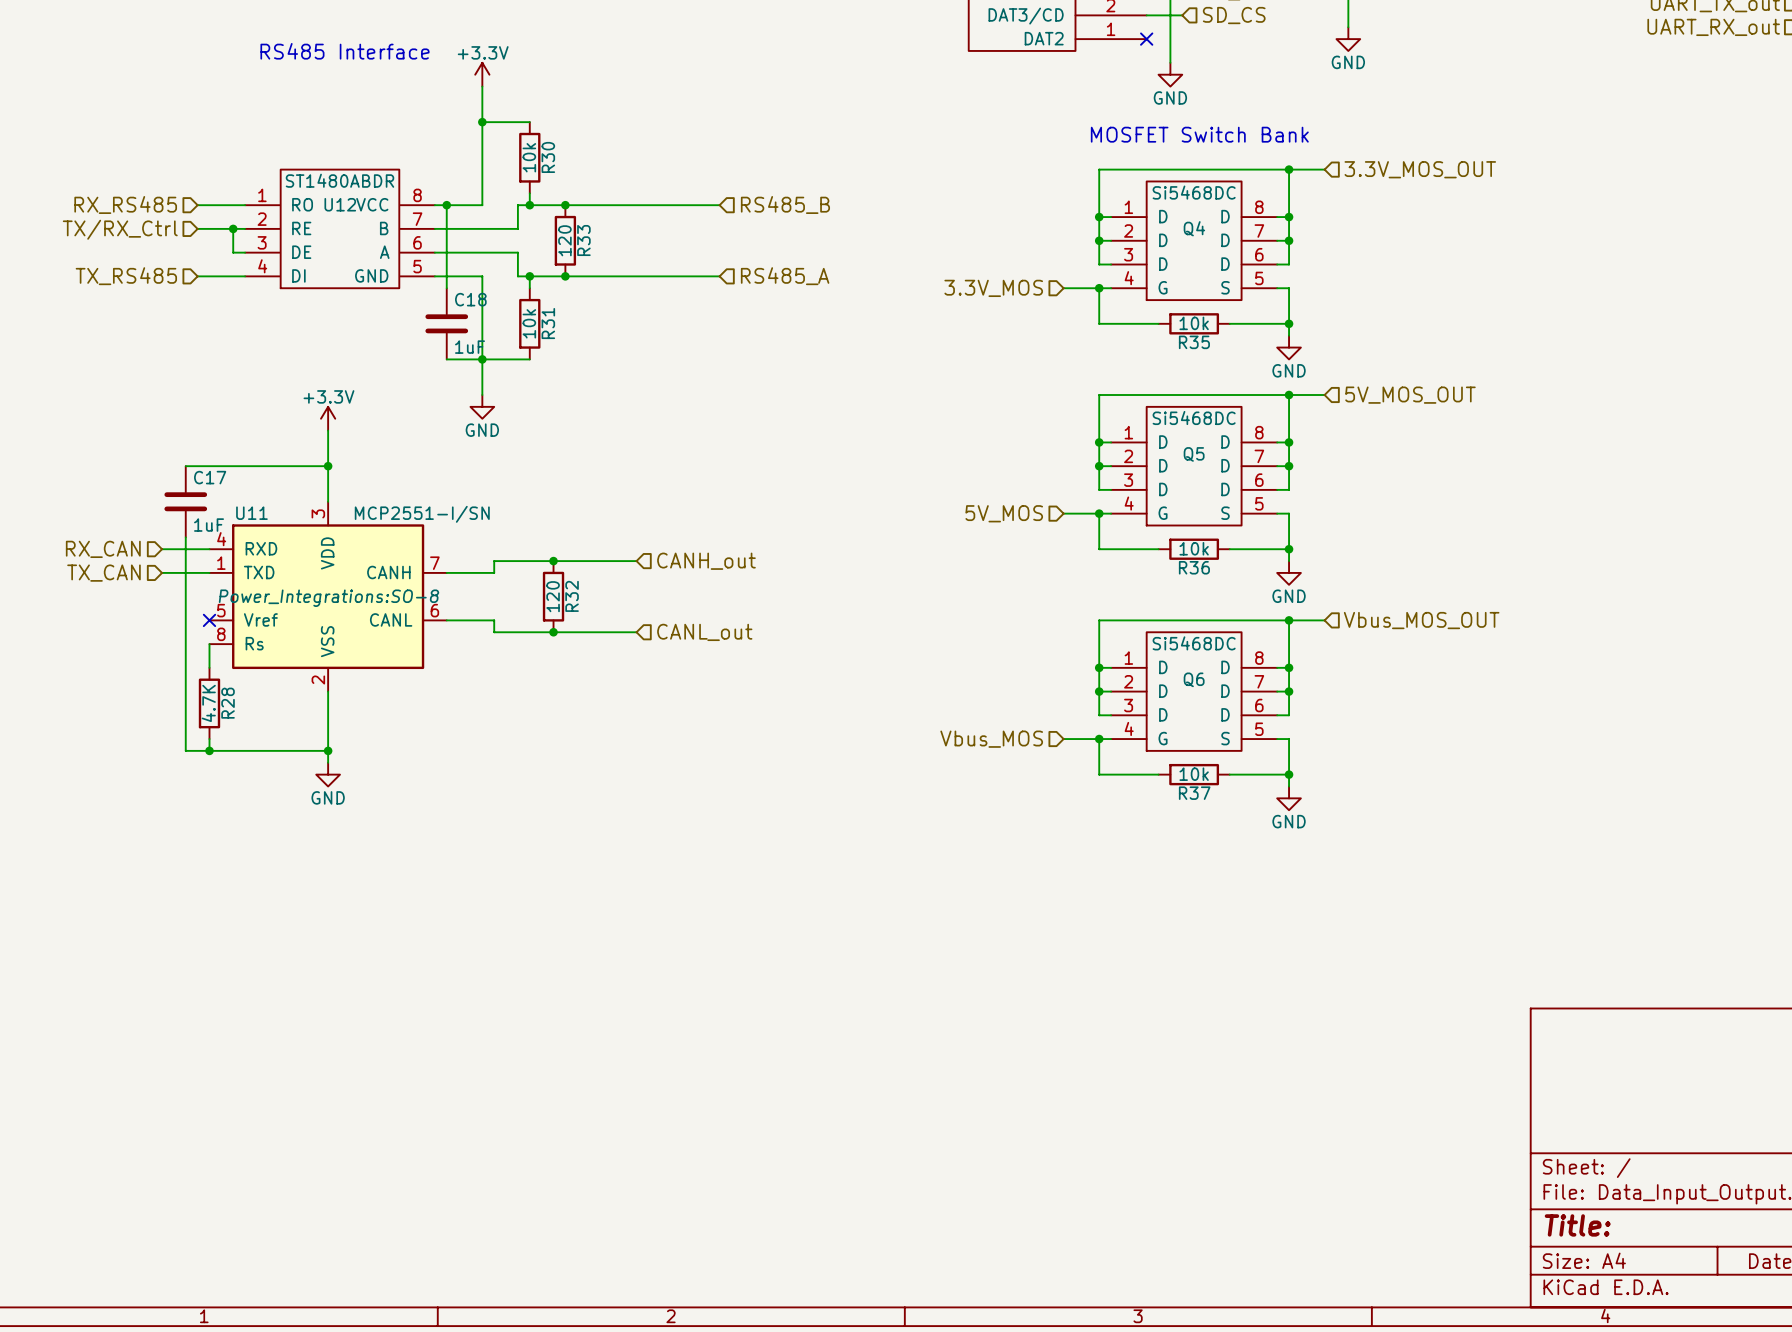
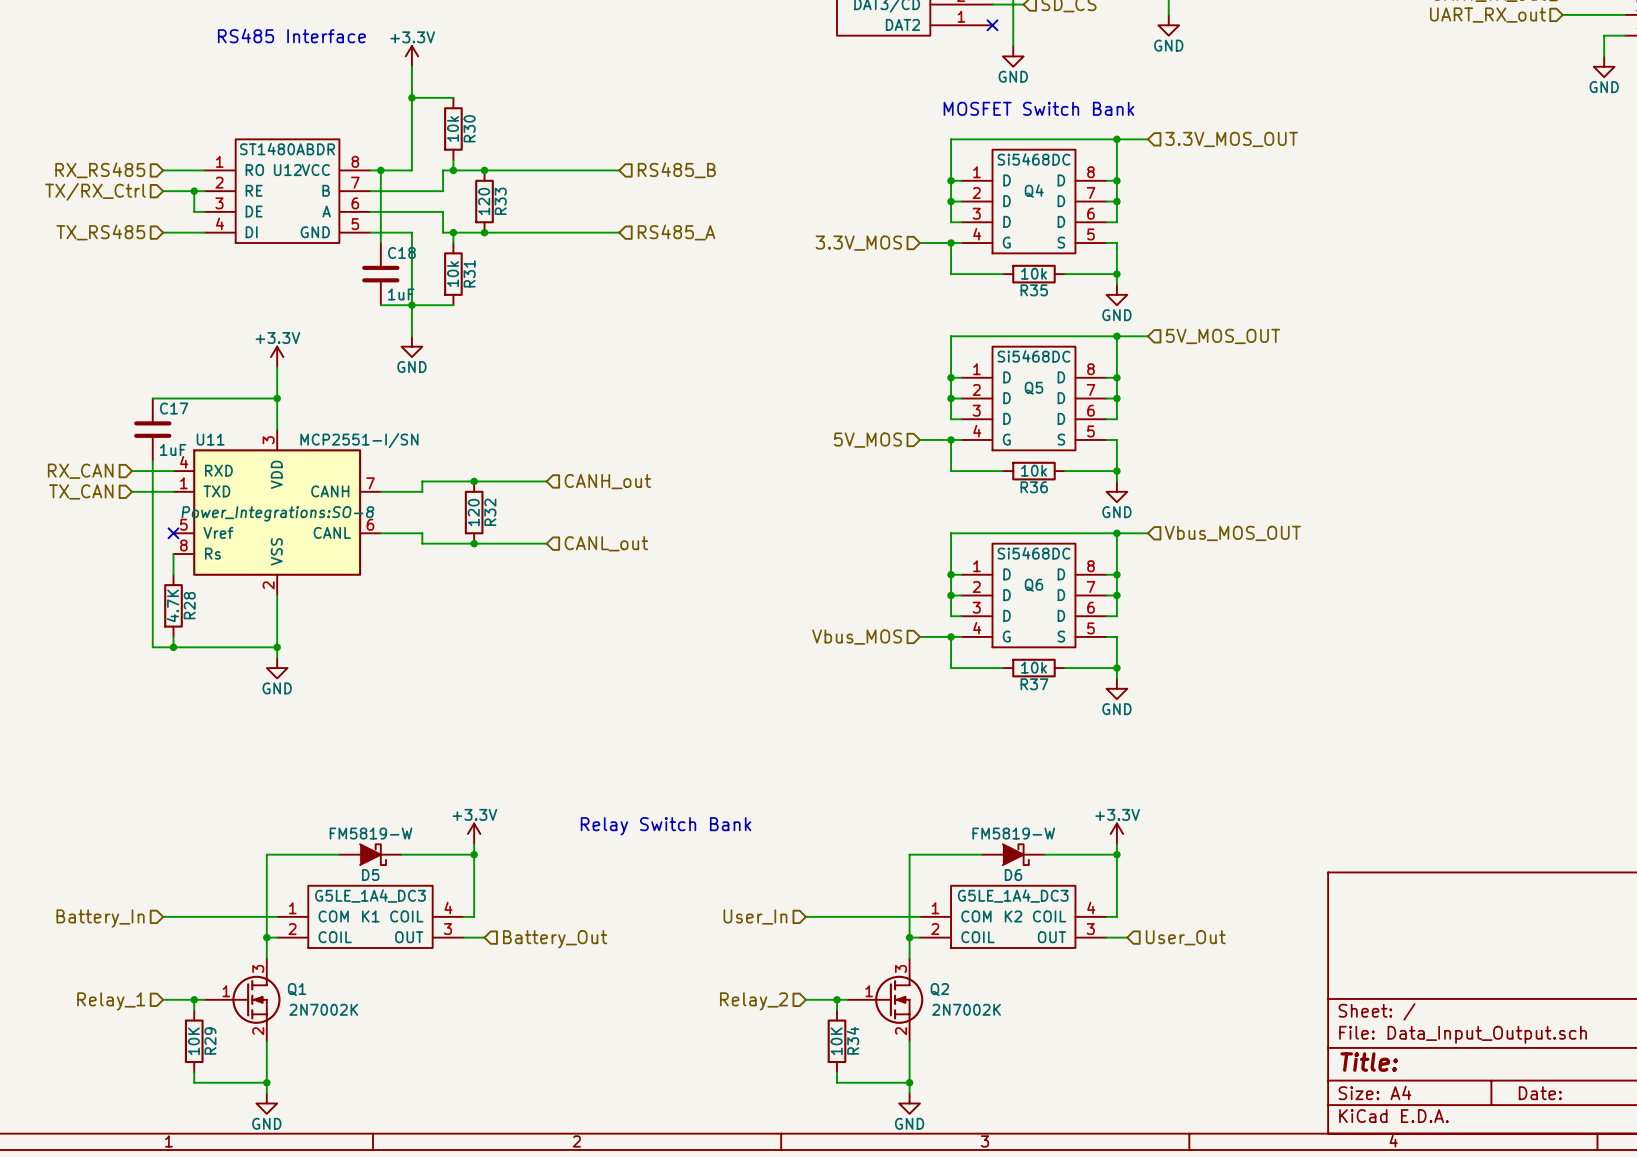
text: none -> Relay Switch Bank (666, 826)
power symbol: none -> +3.3V (474, 833)
power symbol: none -> +3.3V (1116, 833)
wire: none -> (474, 844) (474, 916) (463, 916)
wire: none -> (1116, 844) (1116, 916) (1106, 916)
wire: none -> (339, 854) (266, 854) (266, 958)
D5: none -> FM5819-W (370, 854)
wire: none -> (401, 854) (474, 854)
junction: none -> (474, 854)
wire: none -> (982, 854) (909, 854) (909, 958)
D6: none -> FM5819-W (1013, 854)
wire: none -> (1044, 854) (1116, 854)
junction: none -> (1116, 854)
wire: none -> (163, 916) (277, 916)
K1: none -> G5LE_1A4_DC3 (370, 916)
hierarchical label: none -> User_In (755, 917)
wire: none -> (805, 916) (919, 916)
K2: none -> G5LE_1A4_DC3 (1013, 916)
hierarchical label: none -> Battery_In (100, 918)
wire: none -> (266, 937) (277, 937)
junction: none -> (266, 937)
wire: none -> (463, 937) (484, 937)
wire: none -> (909, 937) (919, 937)
junction: none -> (909, 937)
wire: none -> (1106, 937) (1127, 937)
hierarchical label: none -> User_Out (1185, 937)
hierarchical label: none -> Battery_Out (555, 939)
wire: none -> (163, 999) (204, 999)
wire: none -> (194, 999) (194, 1010)
junction: none -> (194, 999)
Q1: none -> 2N7002K (242, 999)
wire: none -> (805, 999) (847, 999)
wire: none -> (837, 999) (837, 1010)
junction: none -> (837, 999)
Q2: none -> 2N7002K (885, 999)
hierarchical label: none -> Relay_1 (111, 1001)
hierarchical label: none -> Relay_2 (753, 1001)
R29: none -> 10K (194, 1041)
wire: none -> (266, 1041) (266, 1093)
R34: none -> 10K (837, 1041)
wire: none -> (909, 1041) (909, 1093)
wire: none -> (194, 1072) (194, 1082) (266, 1082)
wire: none -> (837, 1072) (837, 1082) (909, 1082)
junction: none -> (266, 1082)
junction: none -> (909, 1082)
power symbol: none -> GND (266, 1103)
power symbol: none -> GND (909, 1103)

